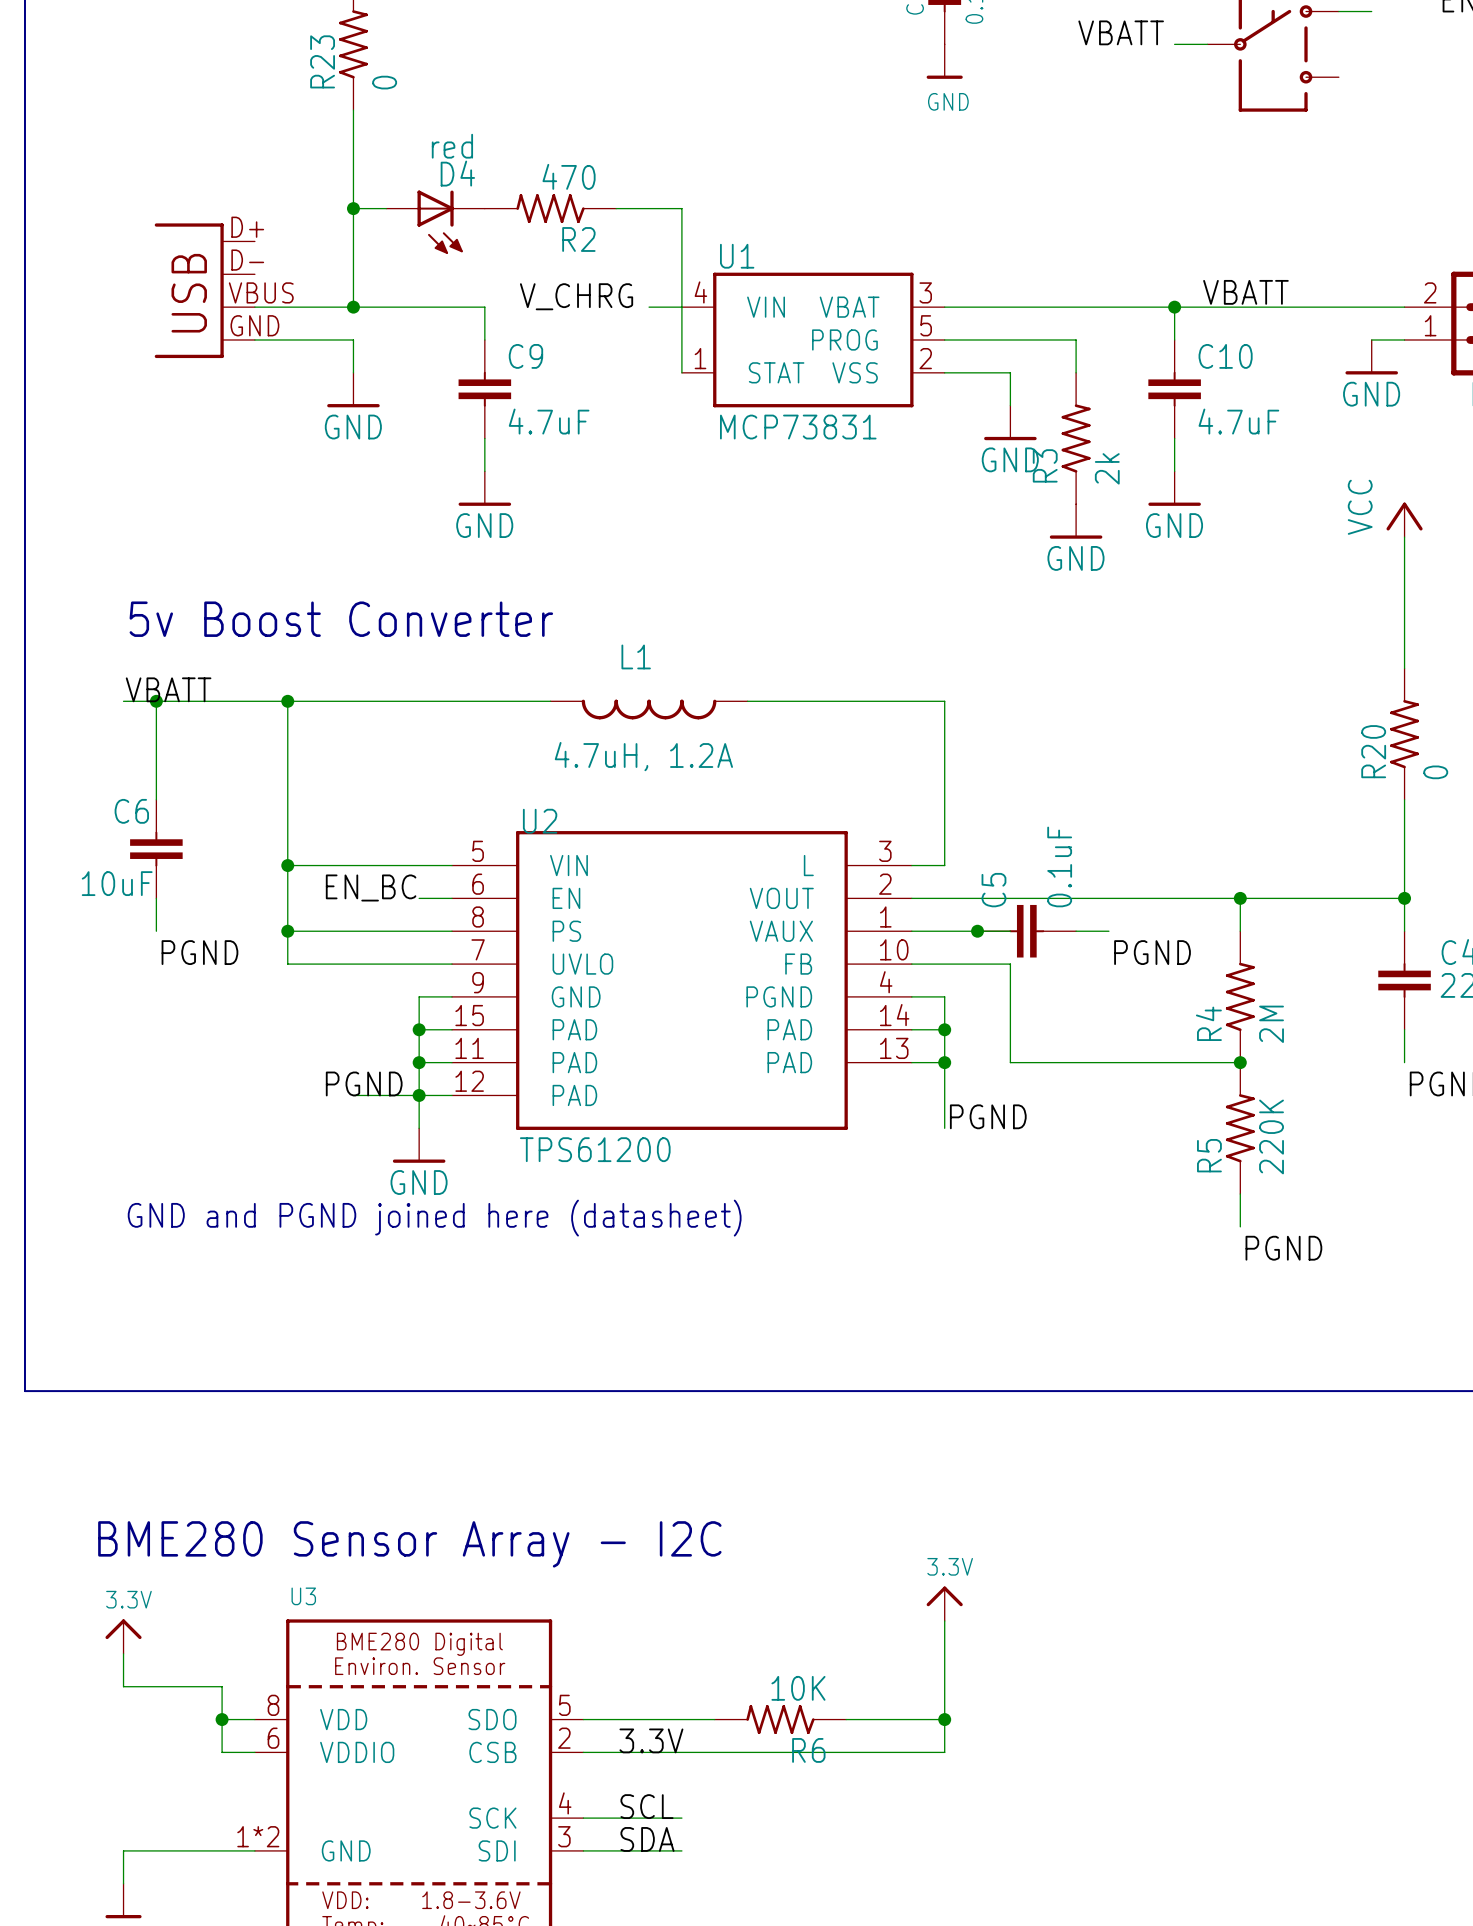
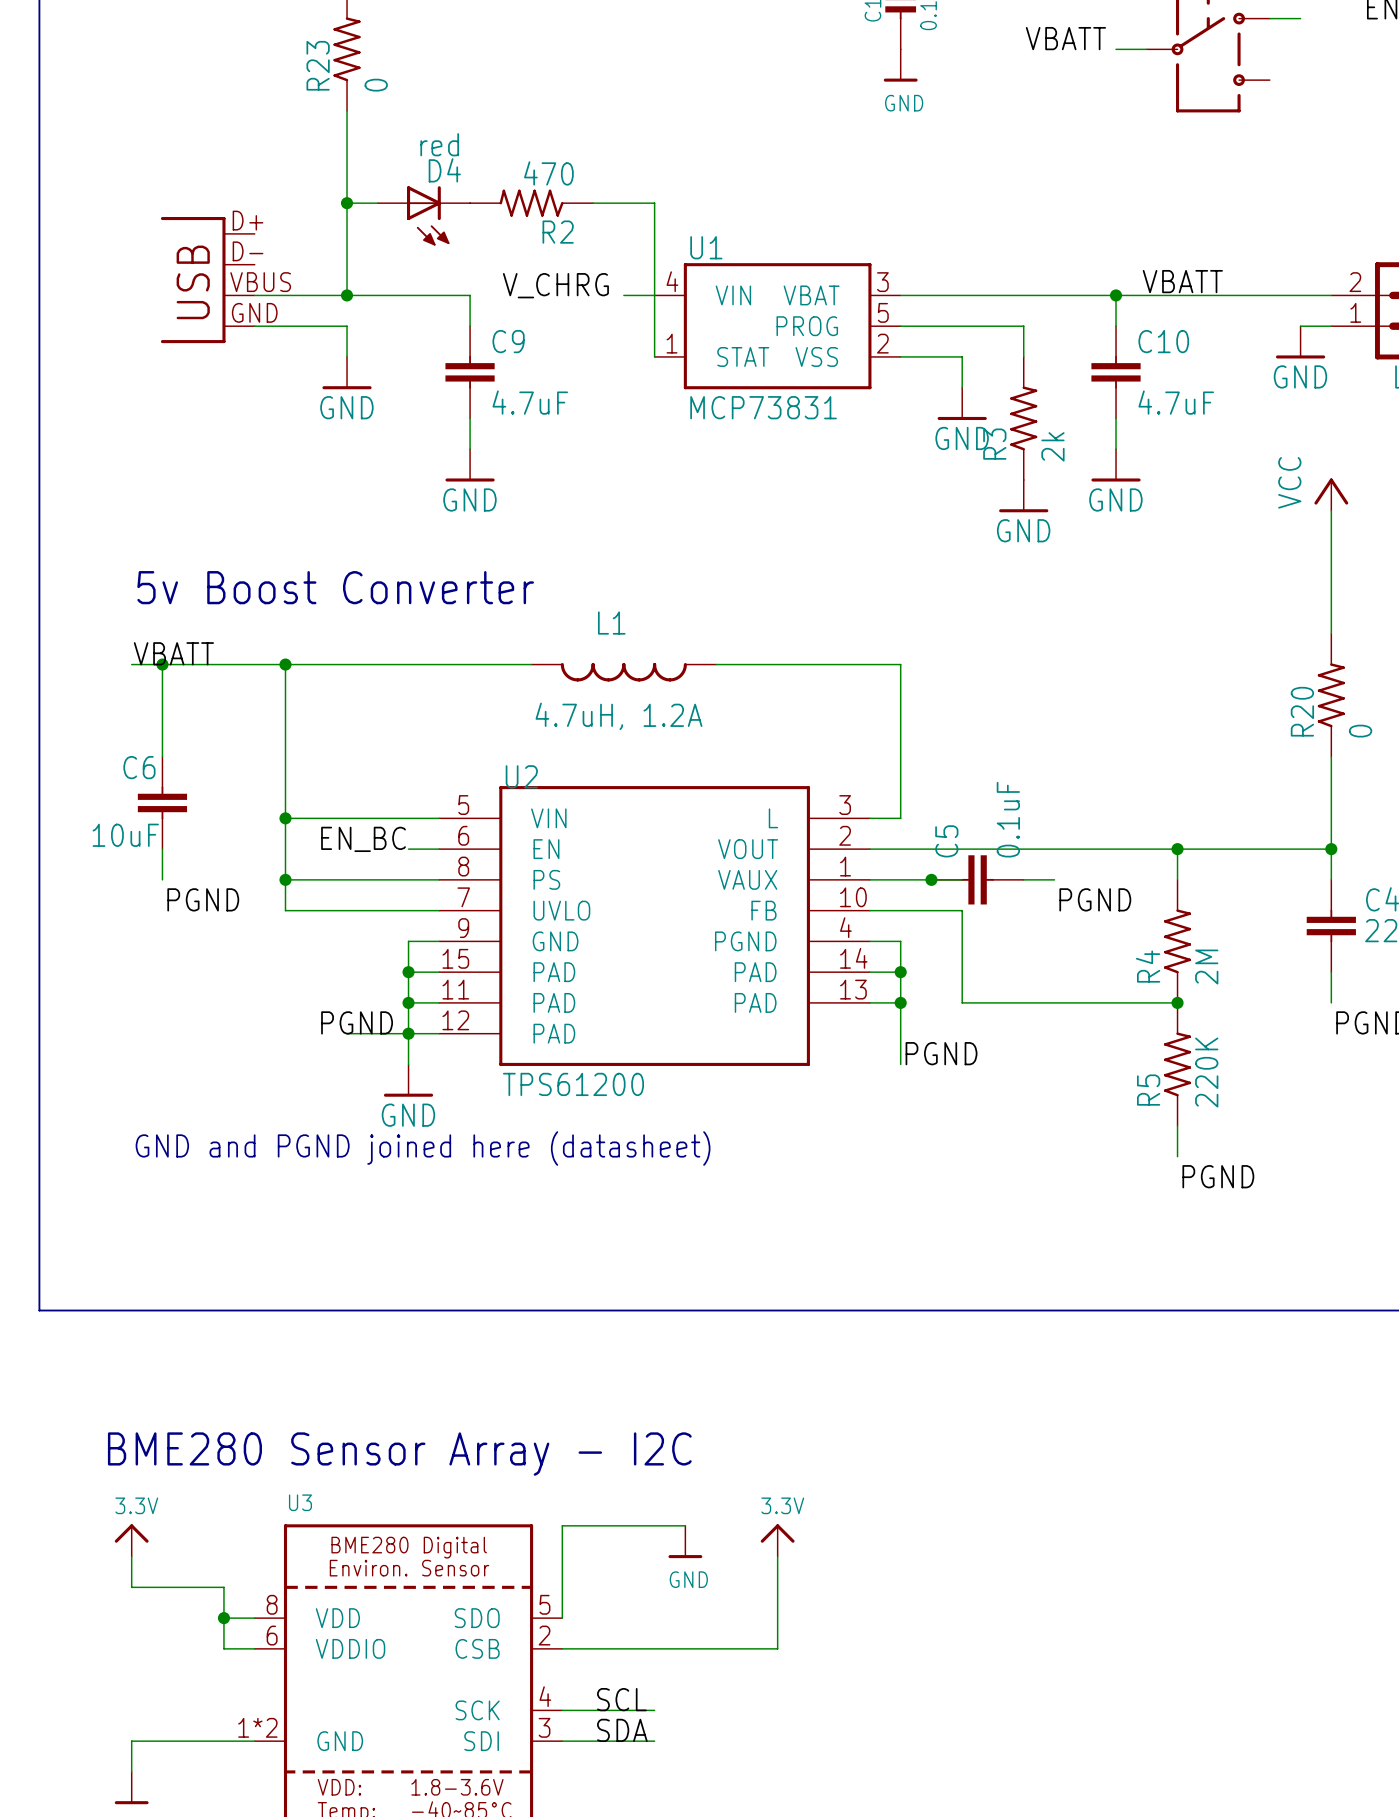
power symbol position: 3.3V (944, 1603) -> 3.3V (777, 1540)
wire: (944, 1621) (944, 1752) (813, 1752) -> (777, 1556) (777, 1648)
power symbol: none -> GND (685, 1541)
wire: (583, 1719) (714, 1719) -> (562, 1618) (562, 1525) (685, 1525)
R6: 10K (780, 1719) -> none
wire: (846, 1719) (944, 1719) -> none
junction: (944, 1719) -> none
label: 3.3V (651, 1740) -> none

